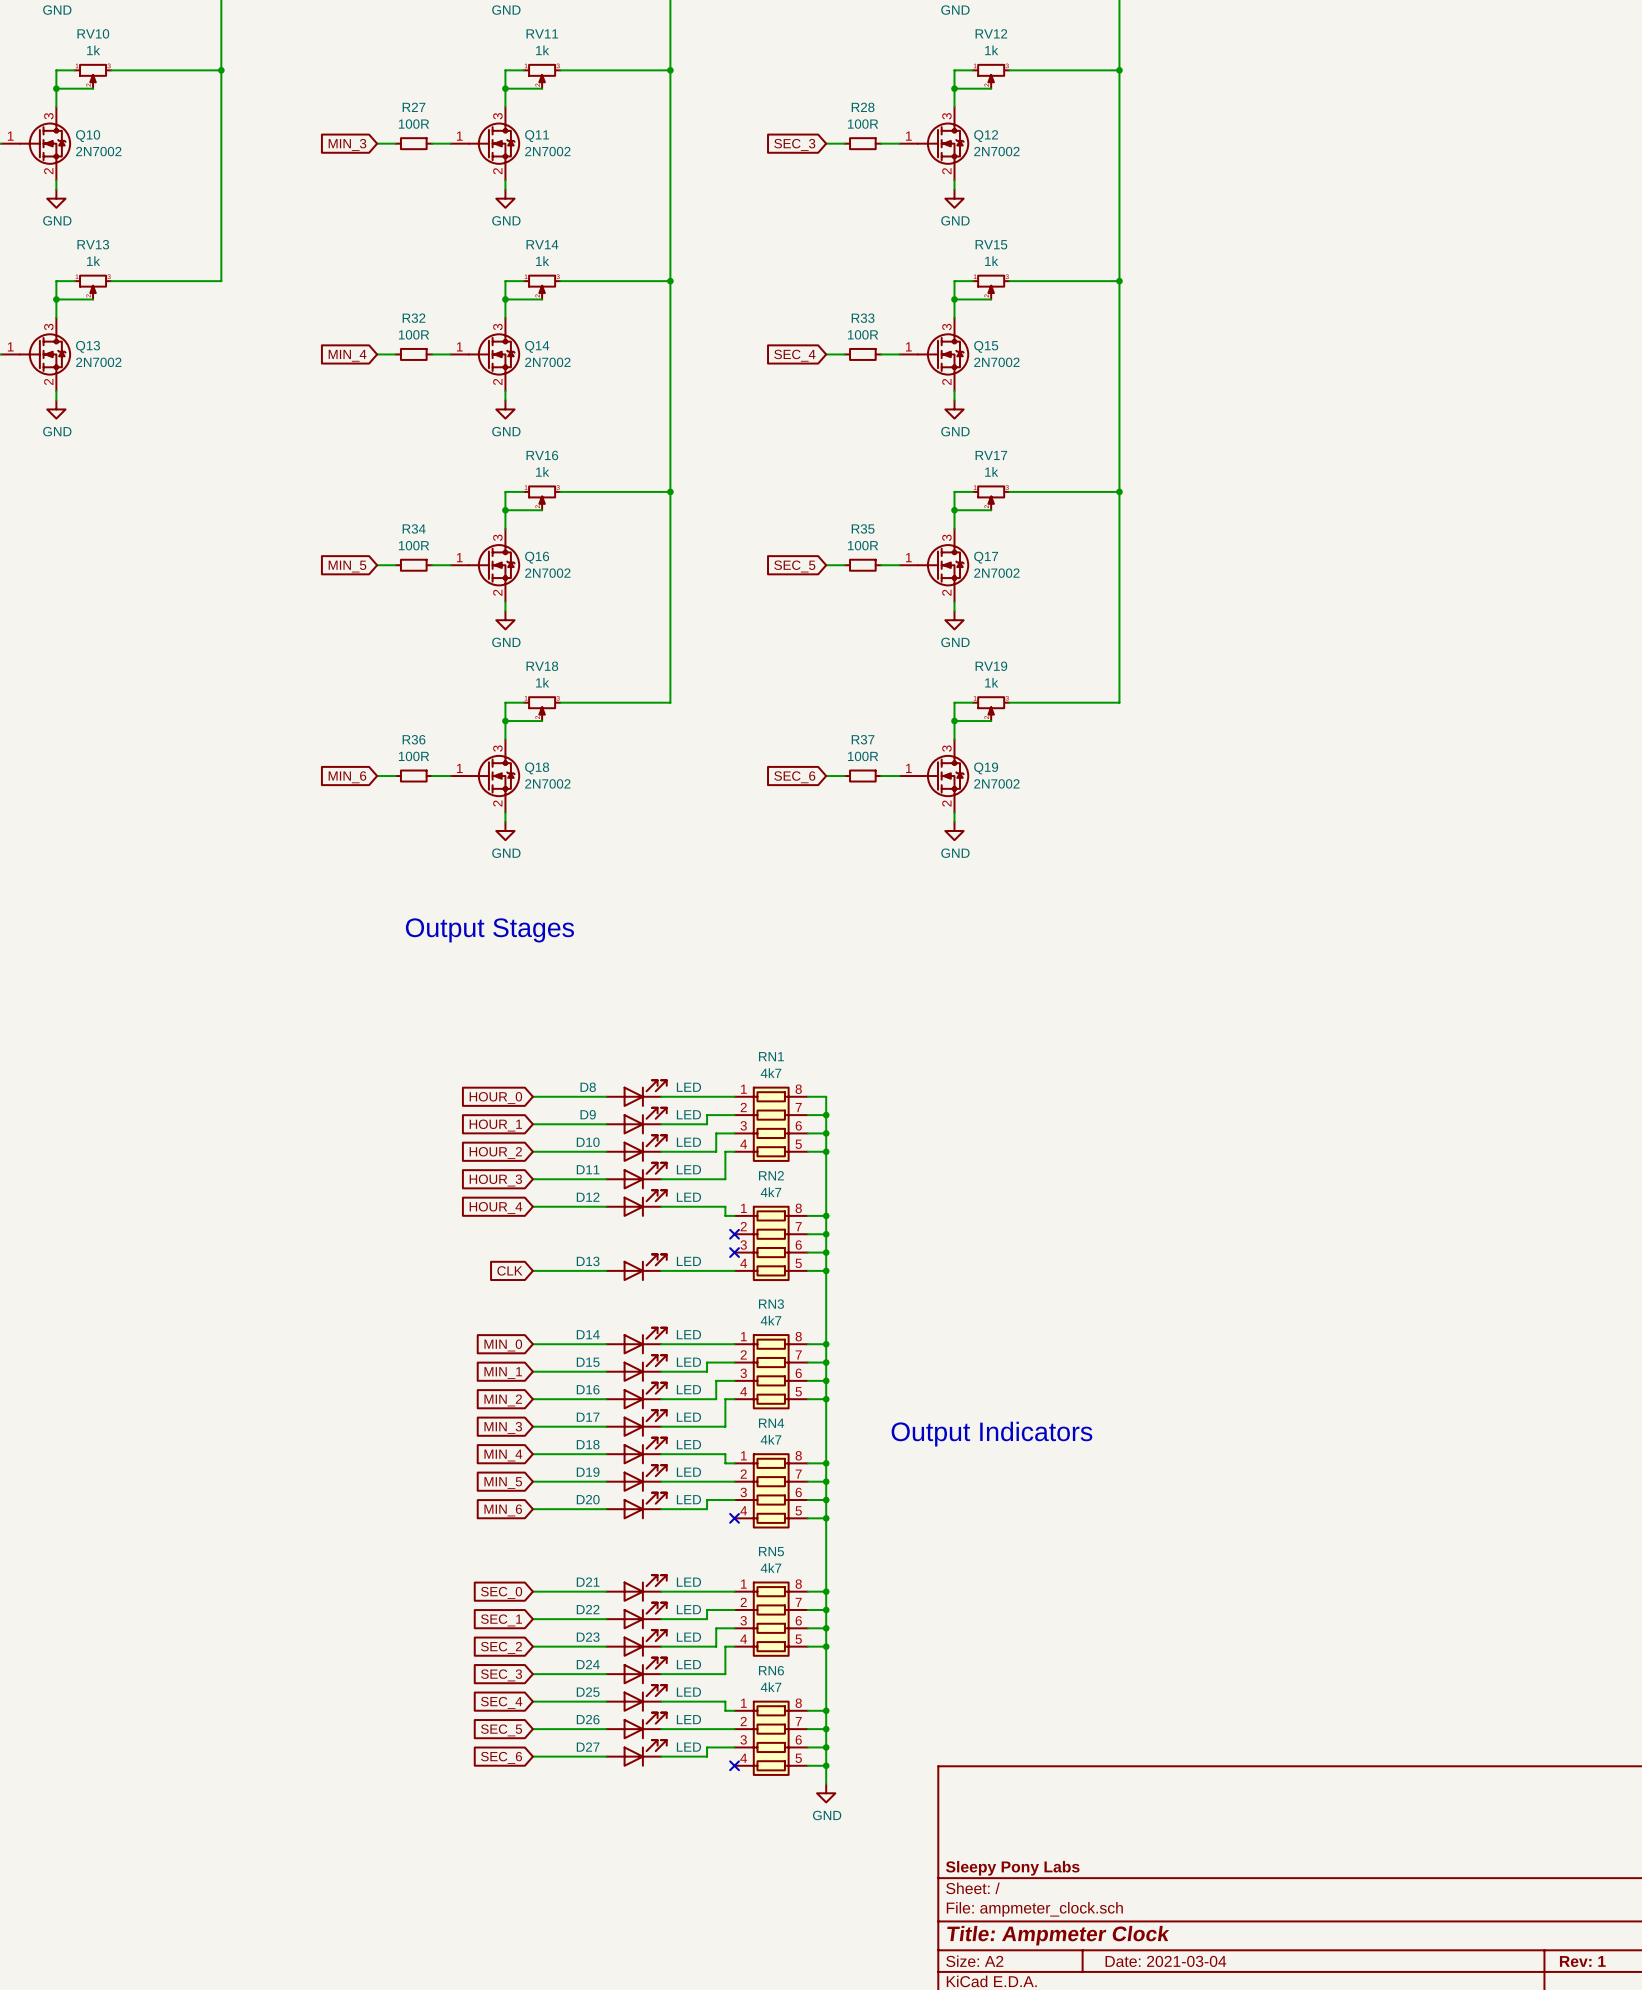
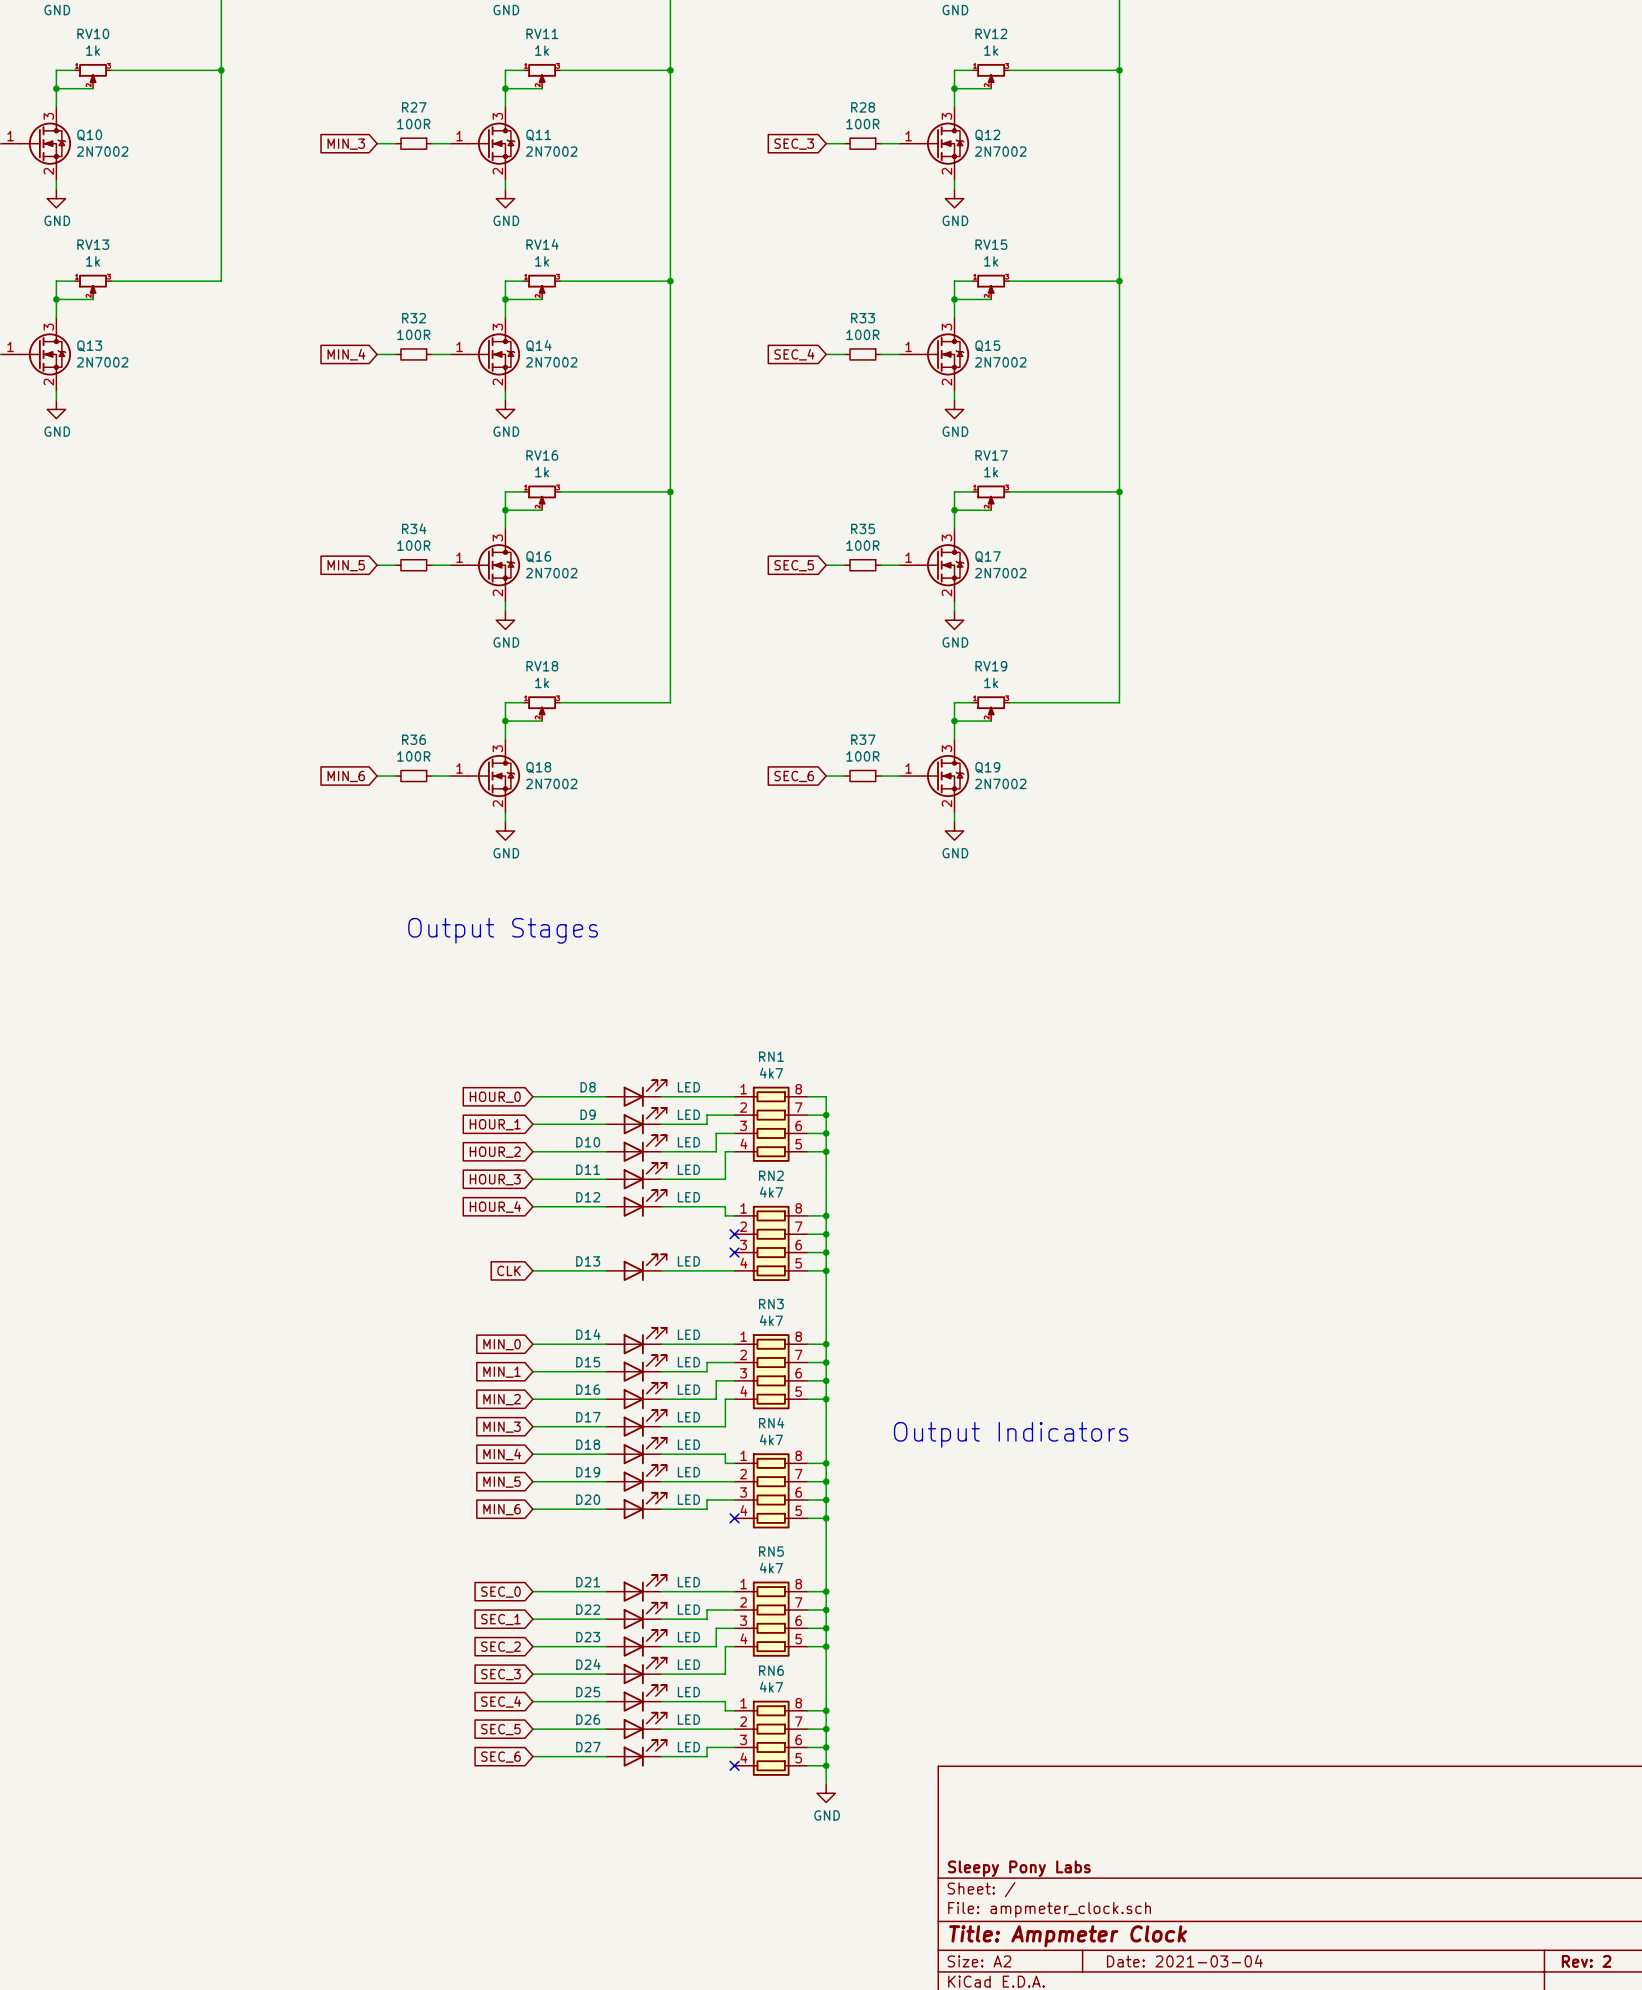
title block: Rev: 1 (1582, 1961) -> Rev: 2 (1586, 1961)

